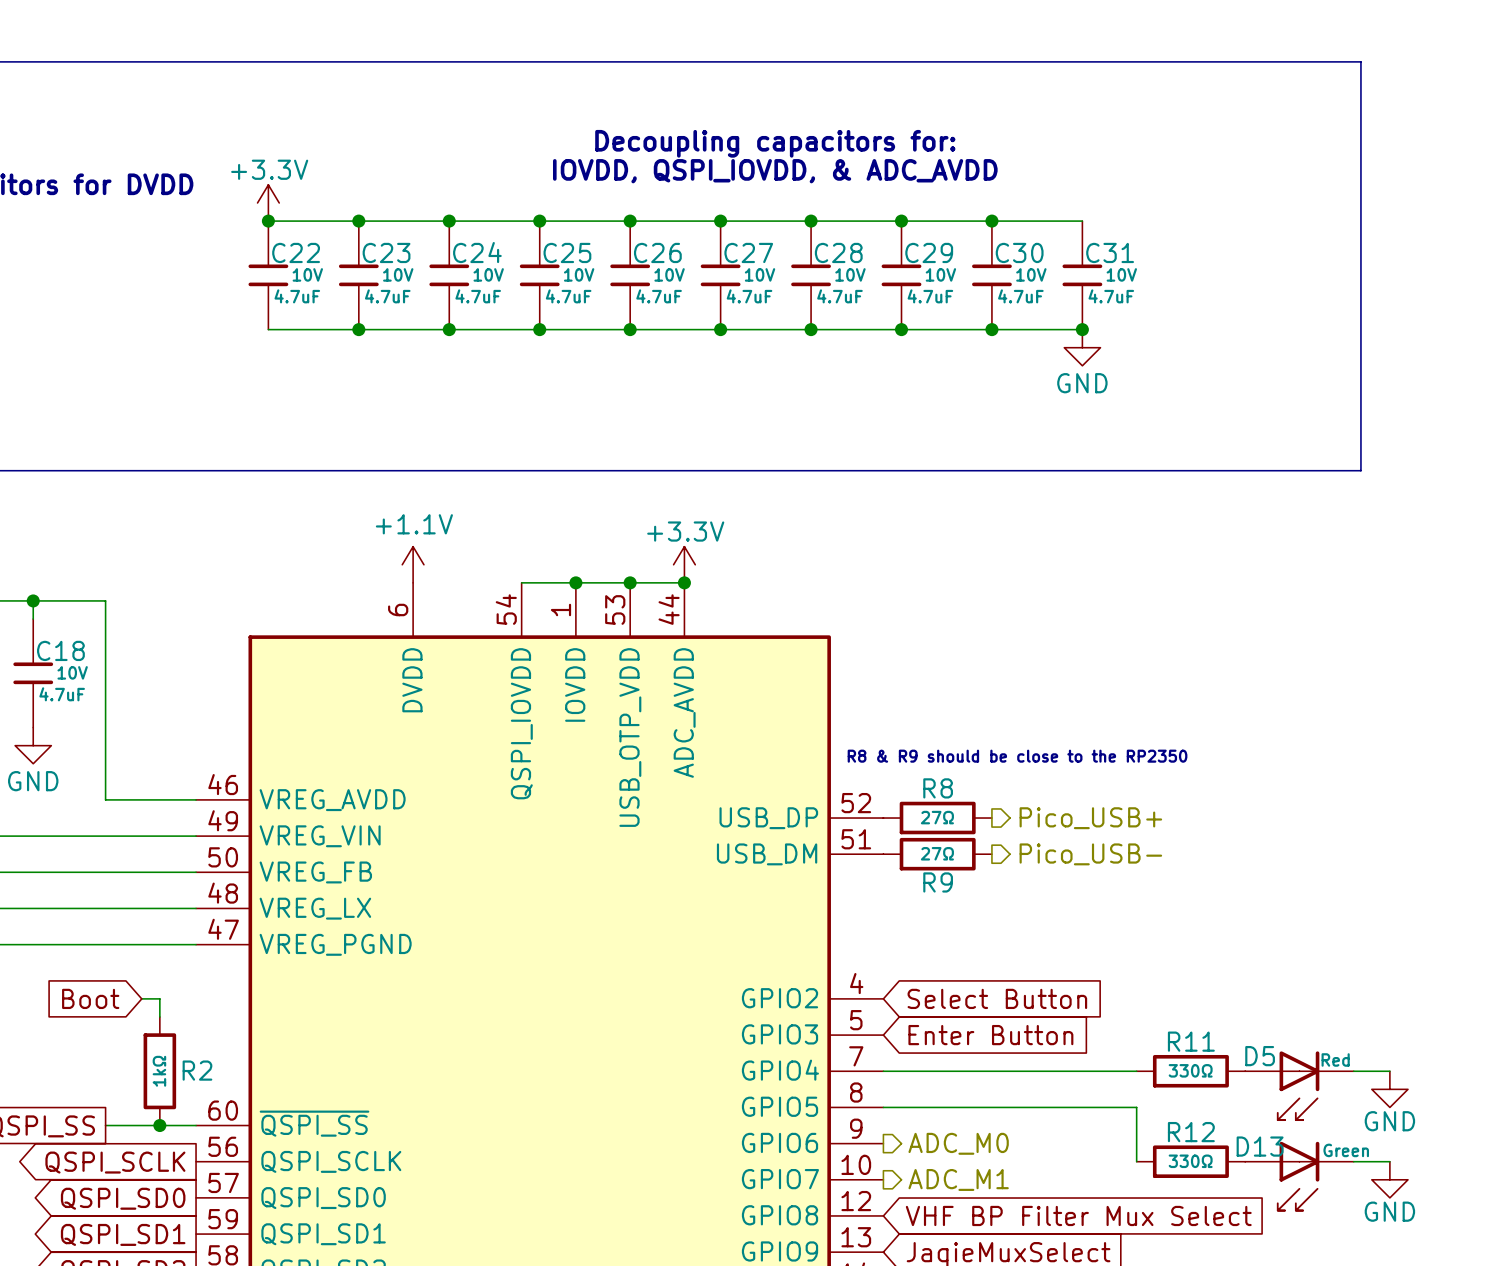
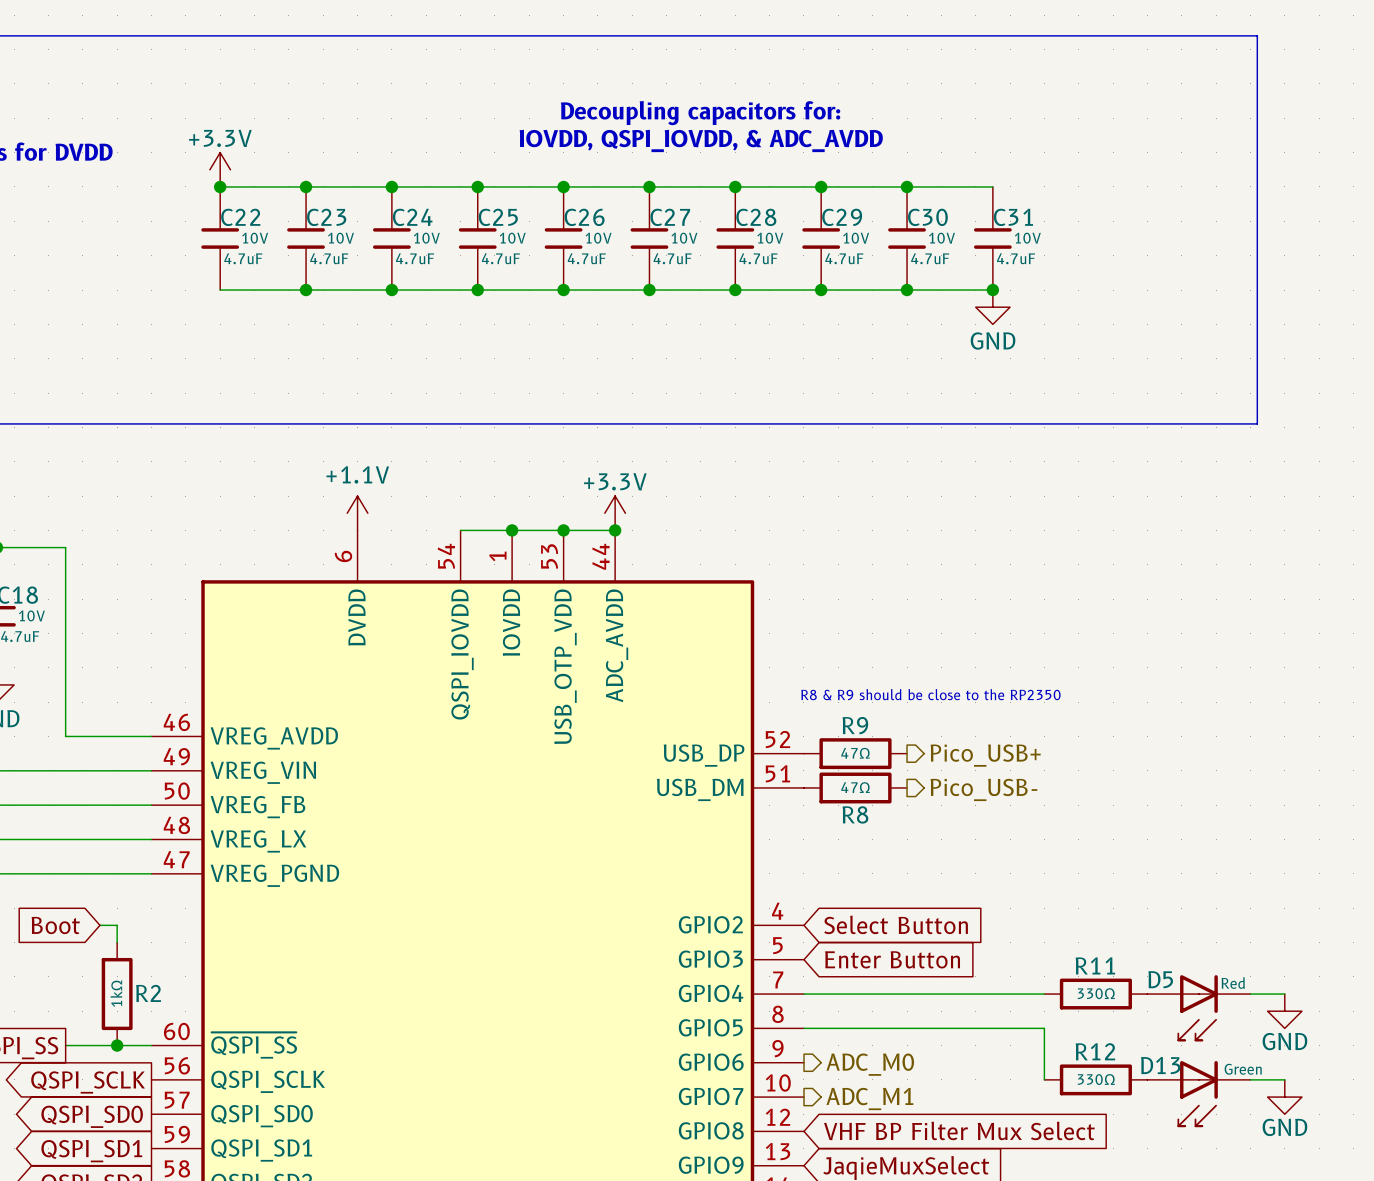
R8 name: R8 (938, 788) -> R9 (855, 725)
R8 value: 27Ω (937, 817) -> 47Ω (855, 753)
R9 value: 27Ω (937, 853) -> 47Ω (855, 787)
R9 name: R9 (938, 882) -> R8 (855, 814)

